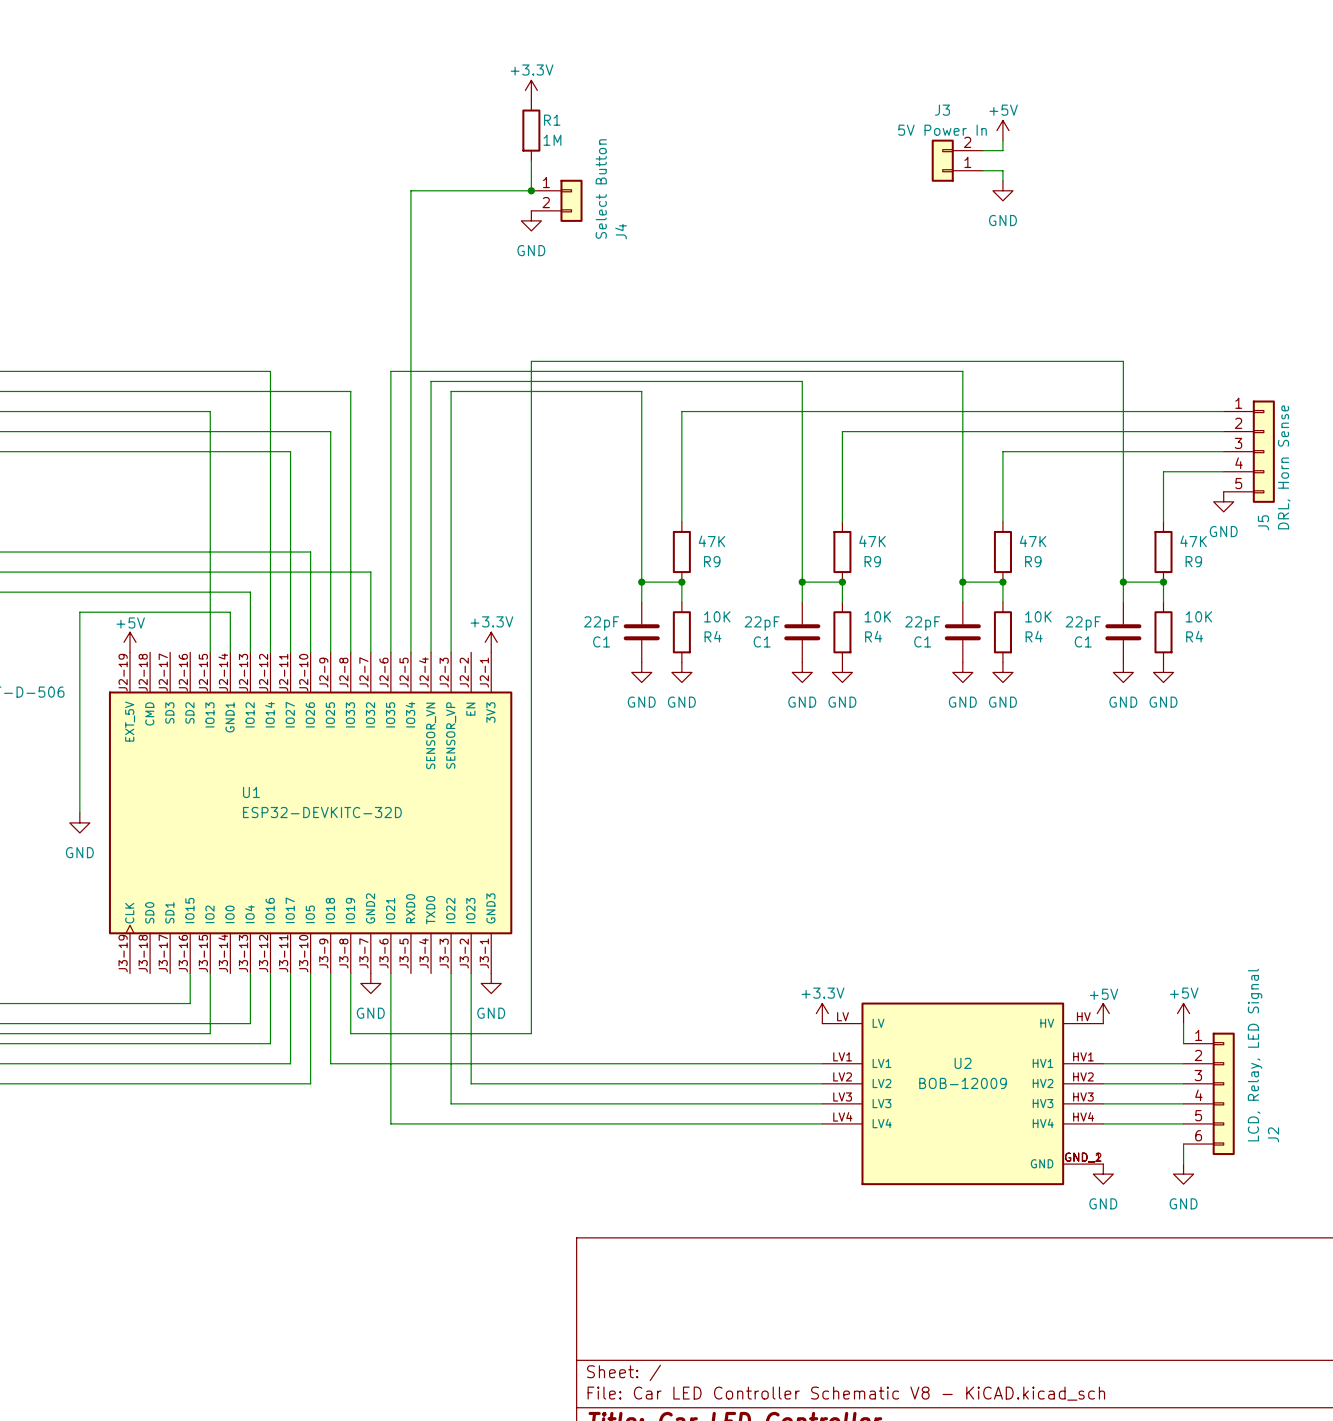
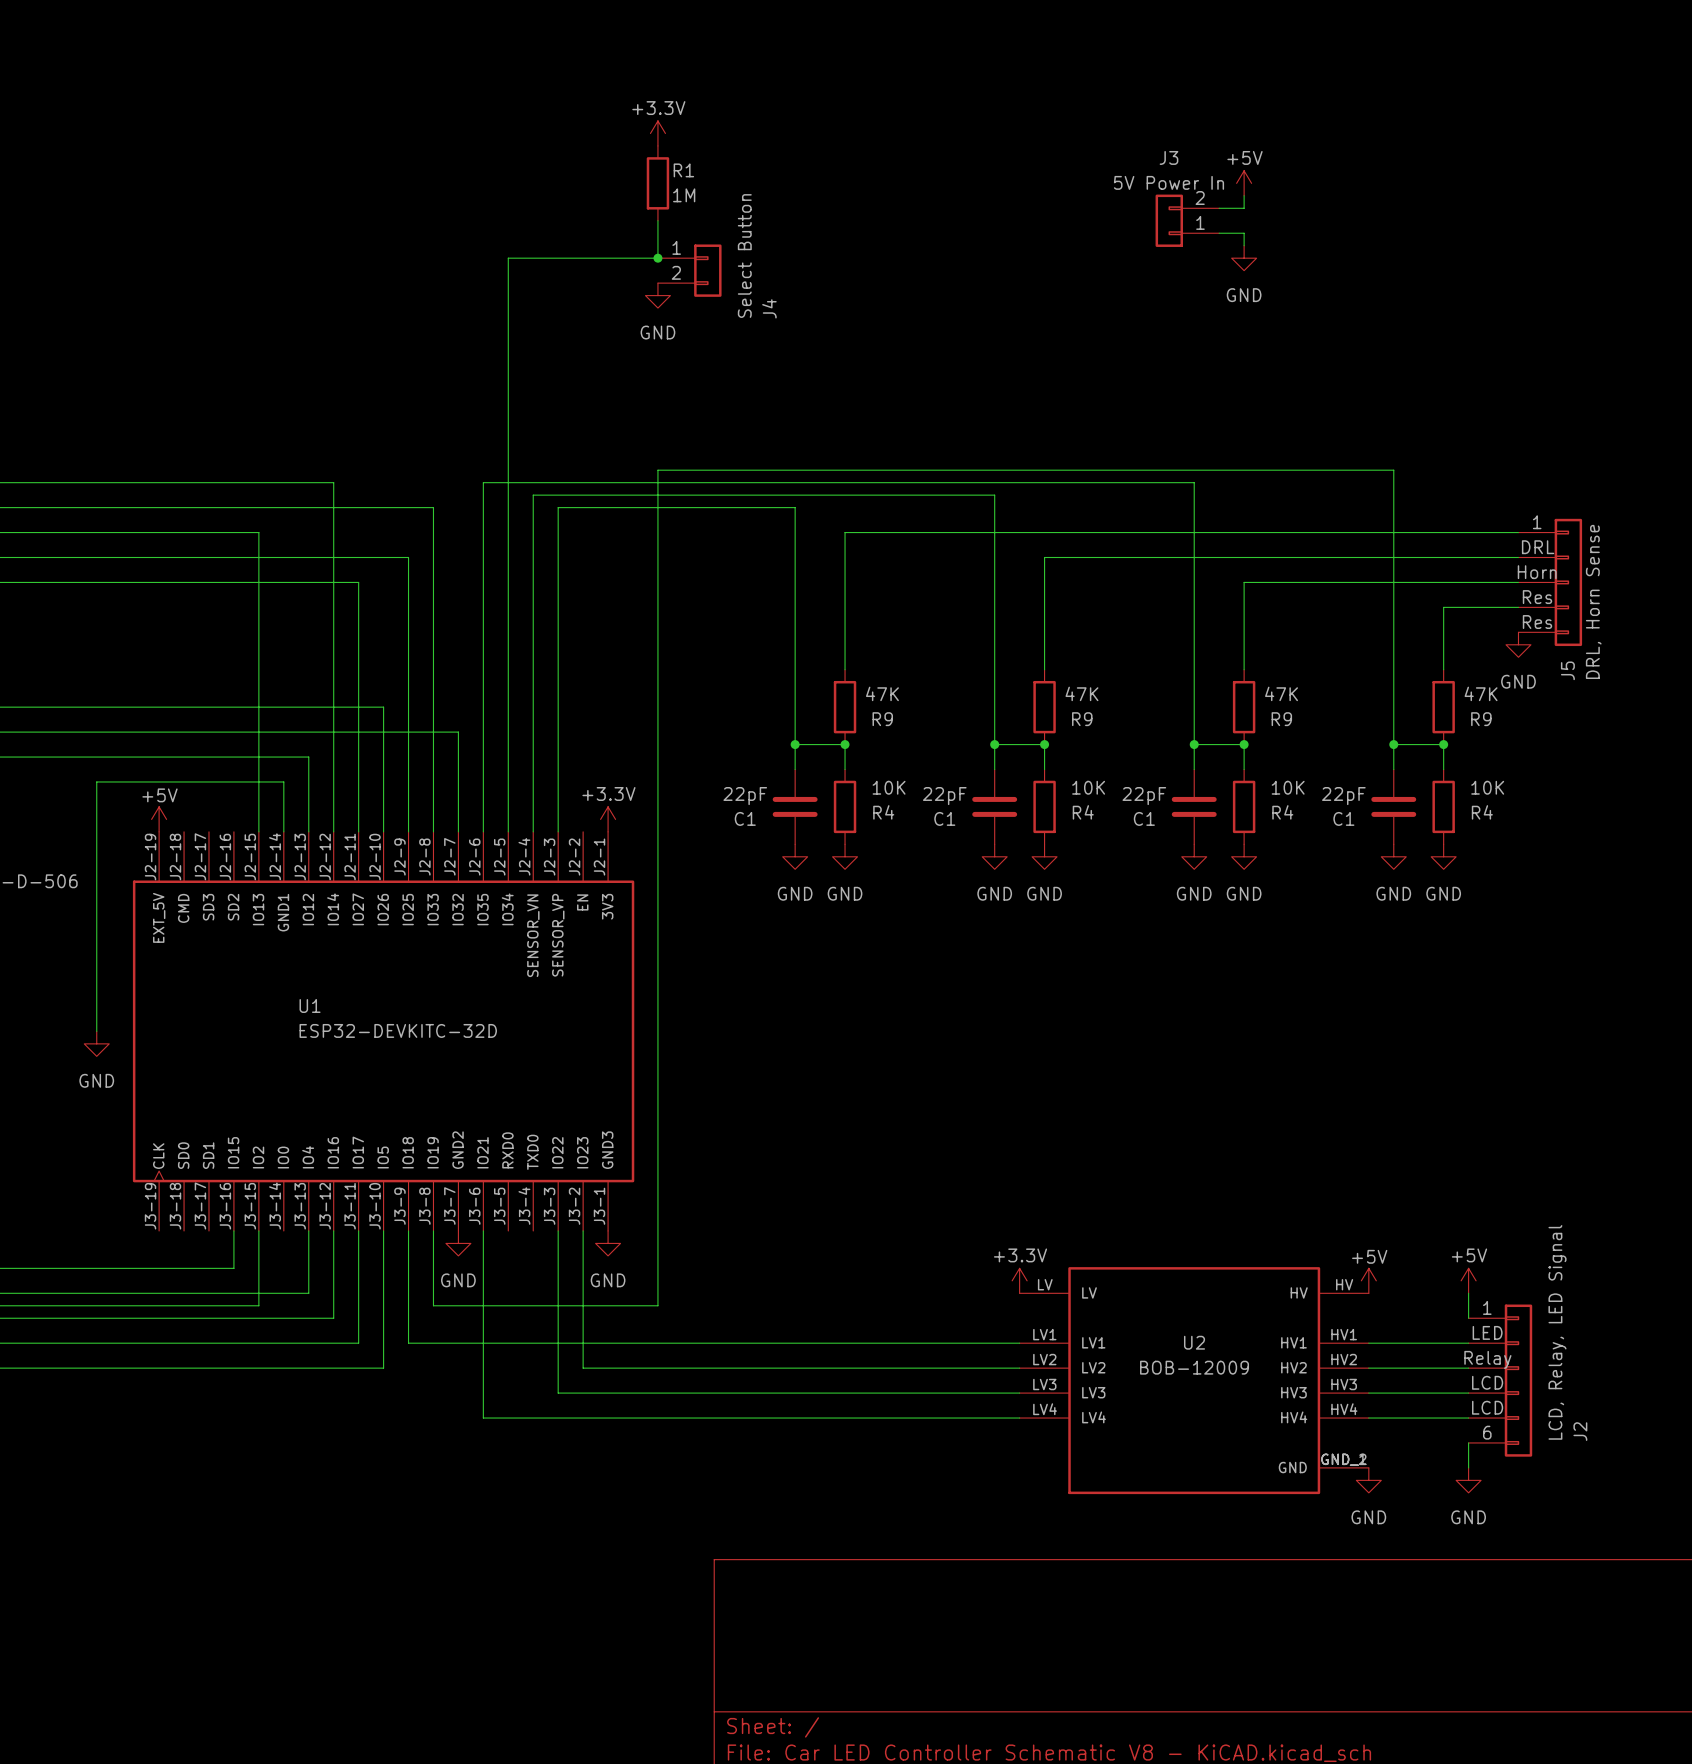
J5 pin number: 2 (1238, 423) -> DRL (1538, 547)
J5 pin number: 3 (1238, 443) -> Horn (1537, 572)
J5 pin number: 4 (1238, 463) -> Res (1537, 597)
J5 pin number: 5 (1238, 483) -> Res (1537, 622)
J2 pin number: 2 (1198, 1055) -> LED (1487, 1332)
J2 pin number: 3 (1198, 1075) -> Relay (1487, 1359)
J2 pin number: 4 (1198, 1095) -> LCD (1487, 1382)
J2 pin number: 5 (1198, 1115) -> LCD (1487, 1407)

